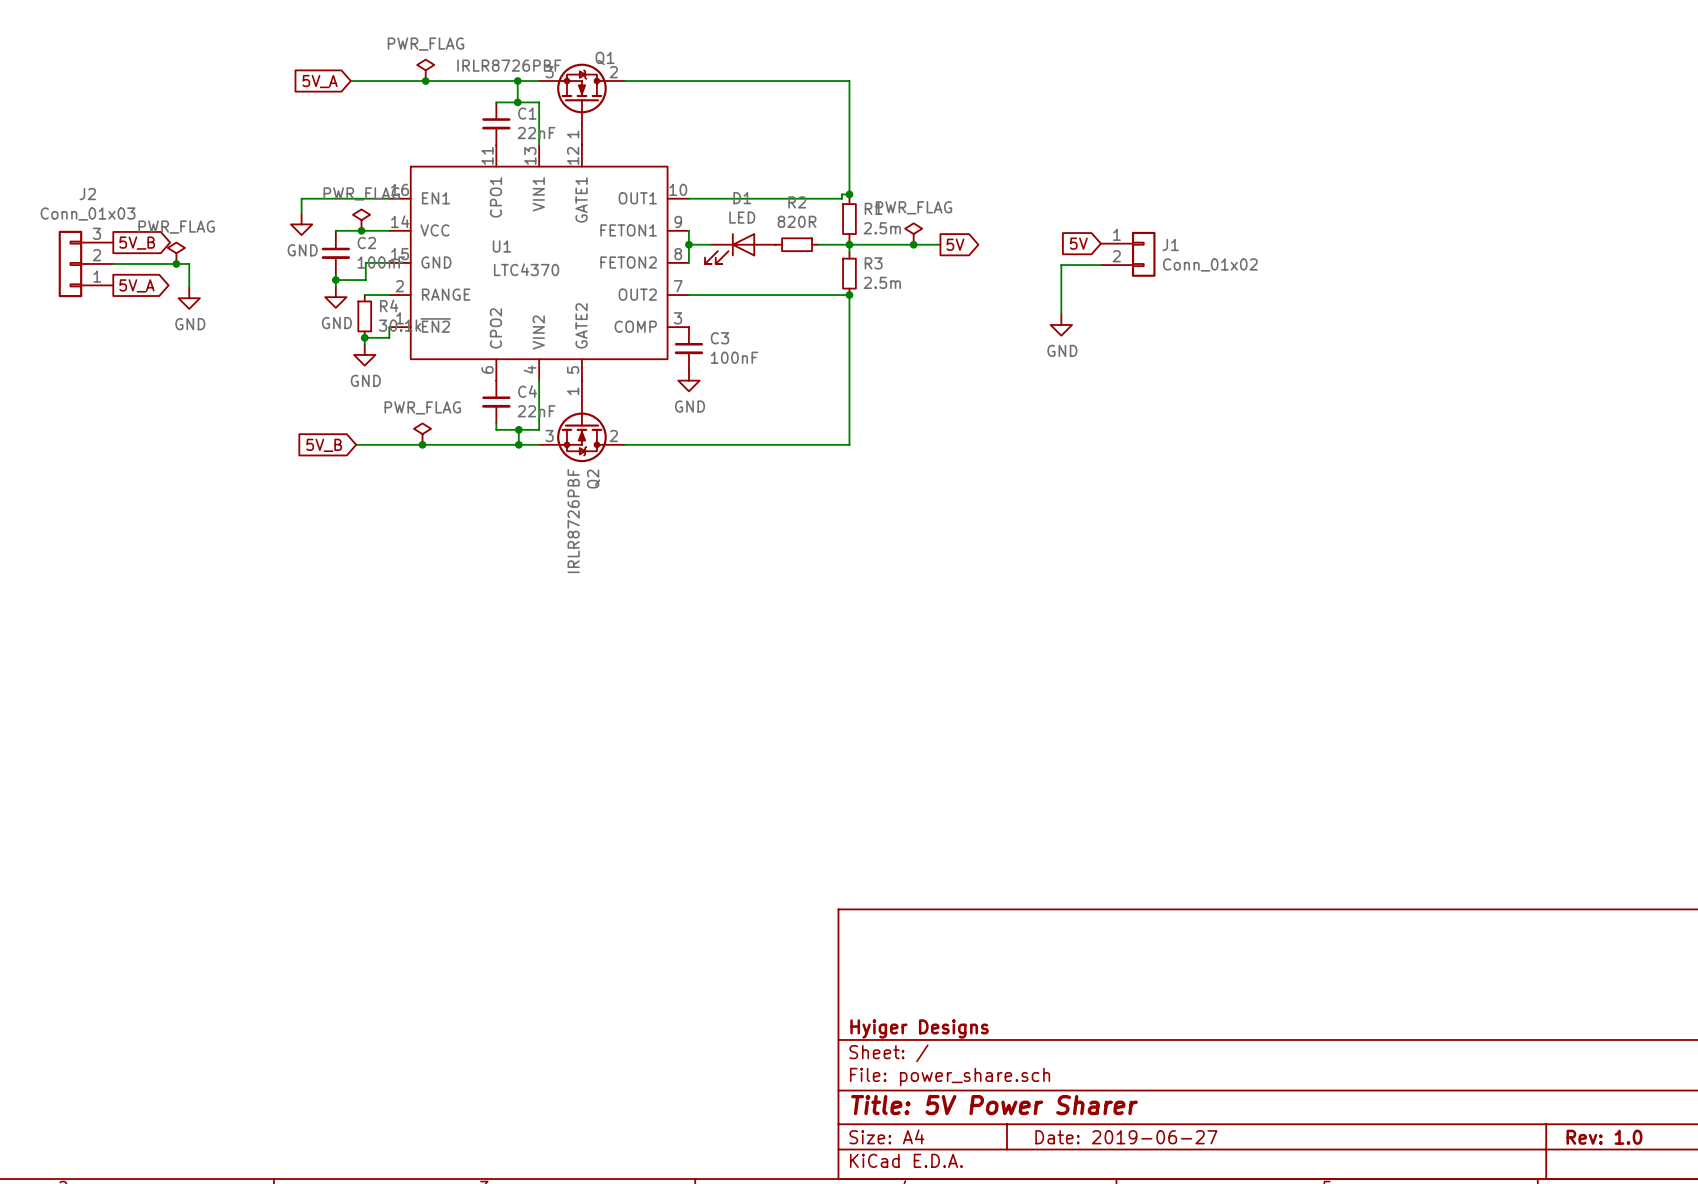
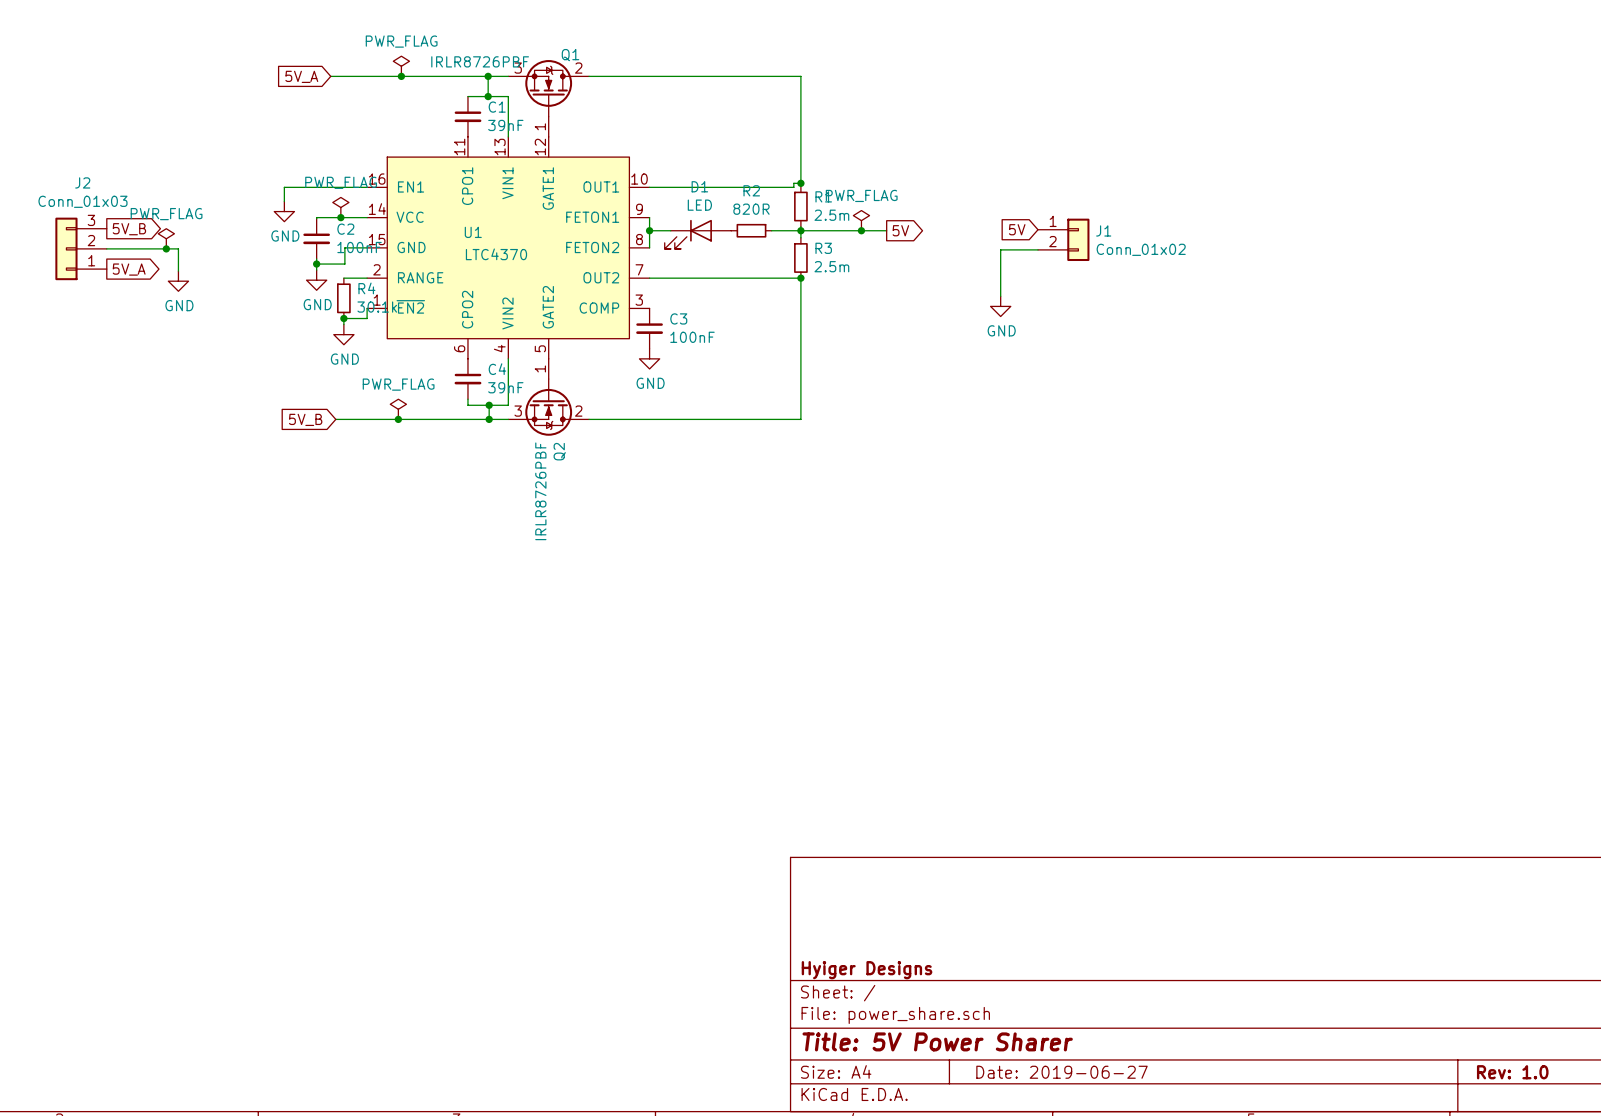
C1 value: 22nF (536, 133) -> 39nF (505, 125)
C4 value: 22nF (536, 411) -> 39nF (505, 387)

